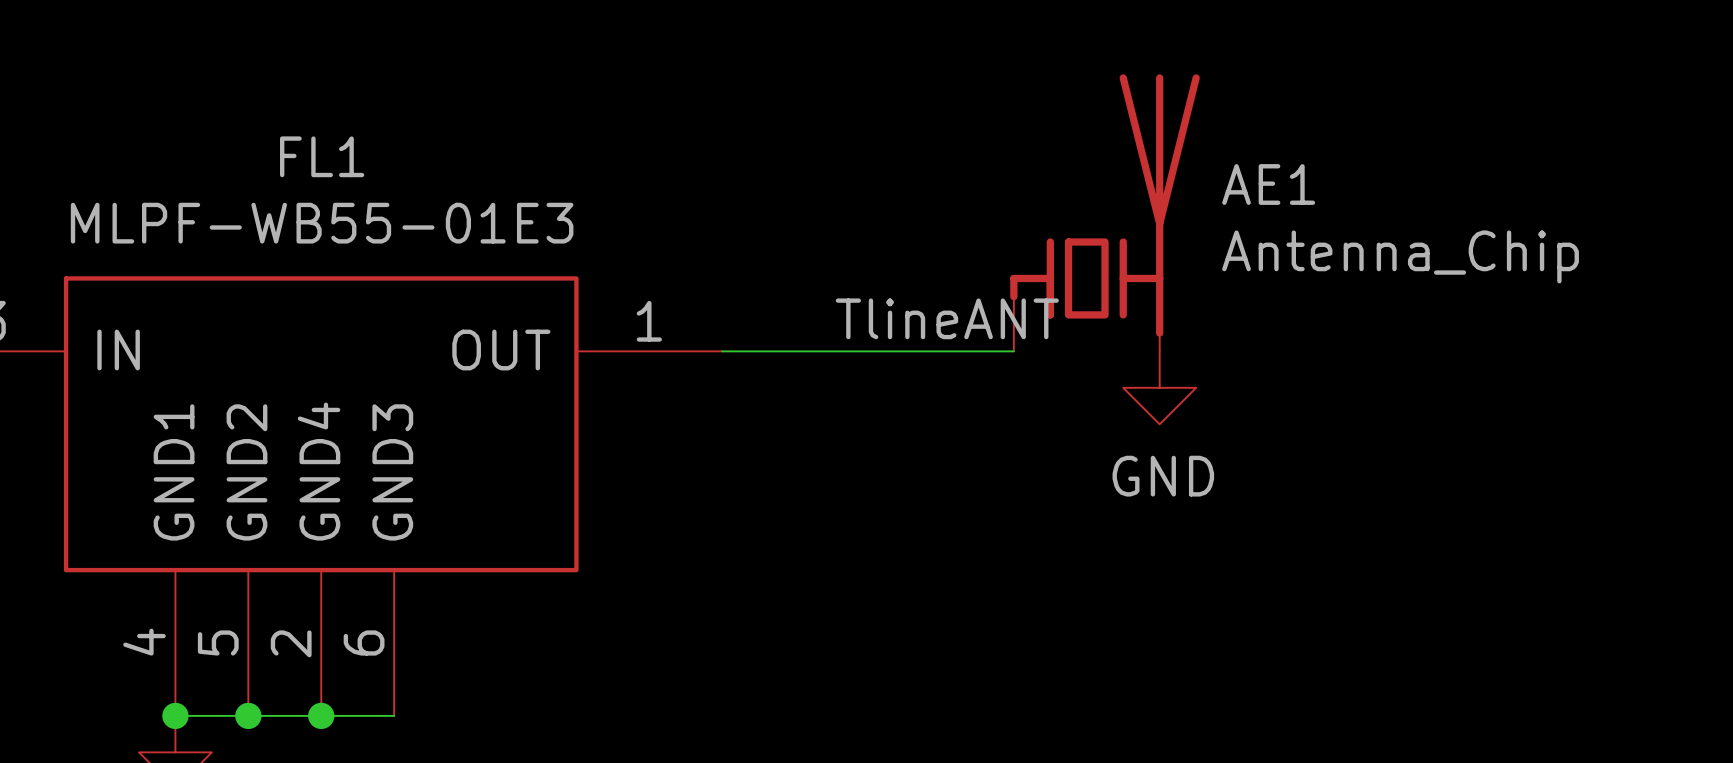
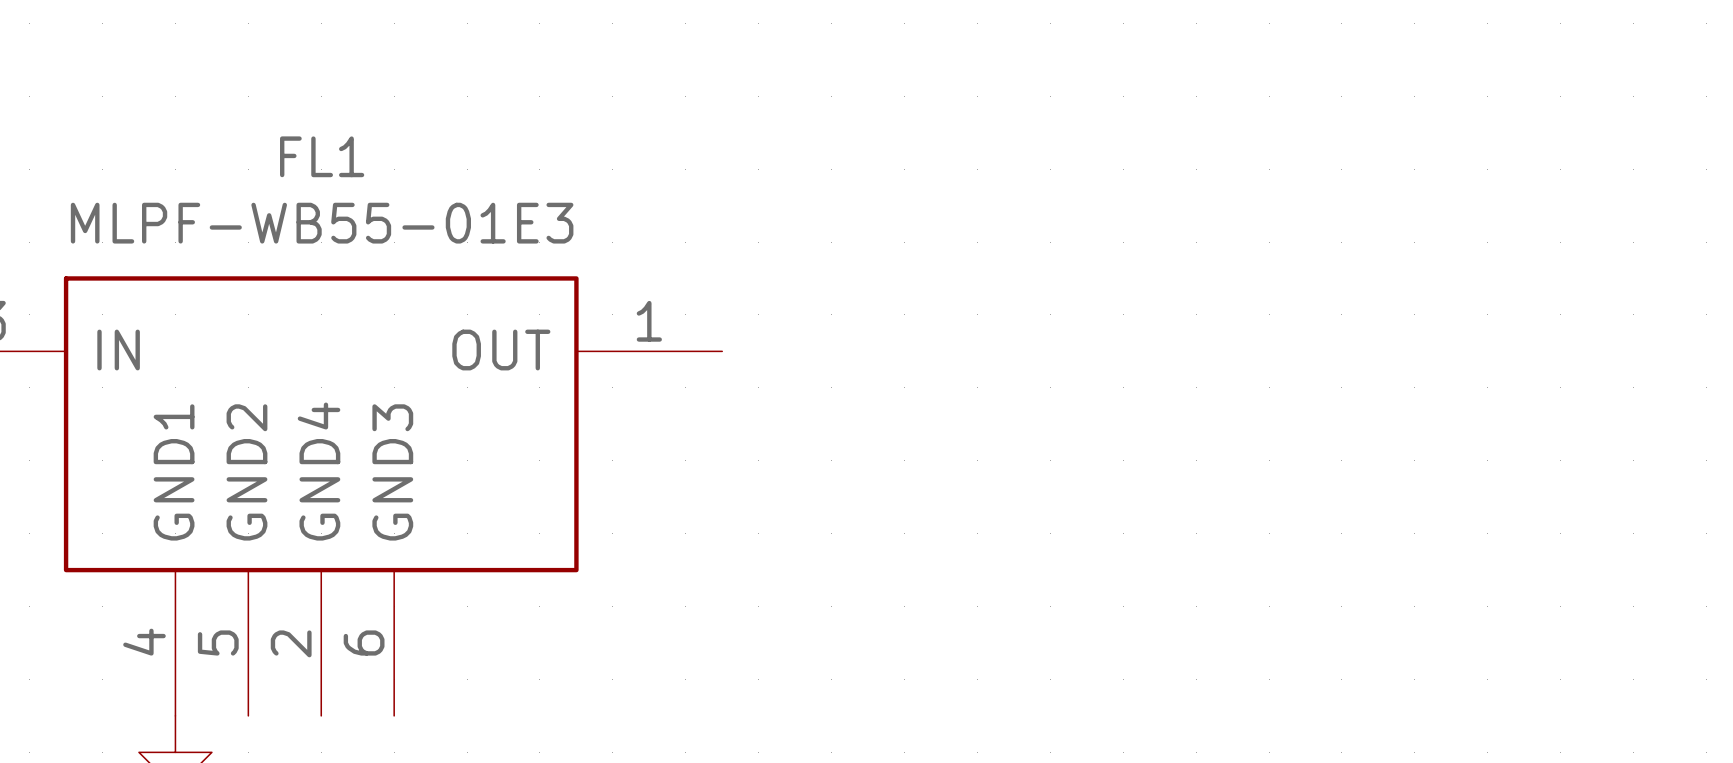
AE1: Antenna_Chip (1105, 212) -> none
label: TlineANT (947, 318) -> none
wire: (722, 351) (1013, 351) -> none
power symbol: GND (1159, 387) -> none
wire: (175, 715) (394, 715) -> none
junction: (175, 715) -> none
junction: (248, 715) -> none
junction: (321, 715) -> none

